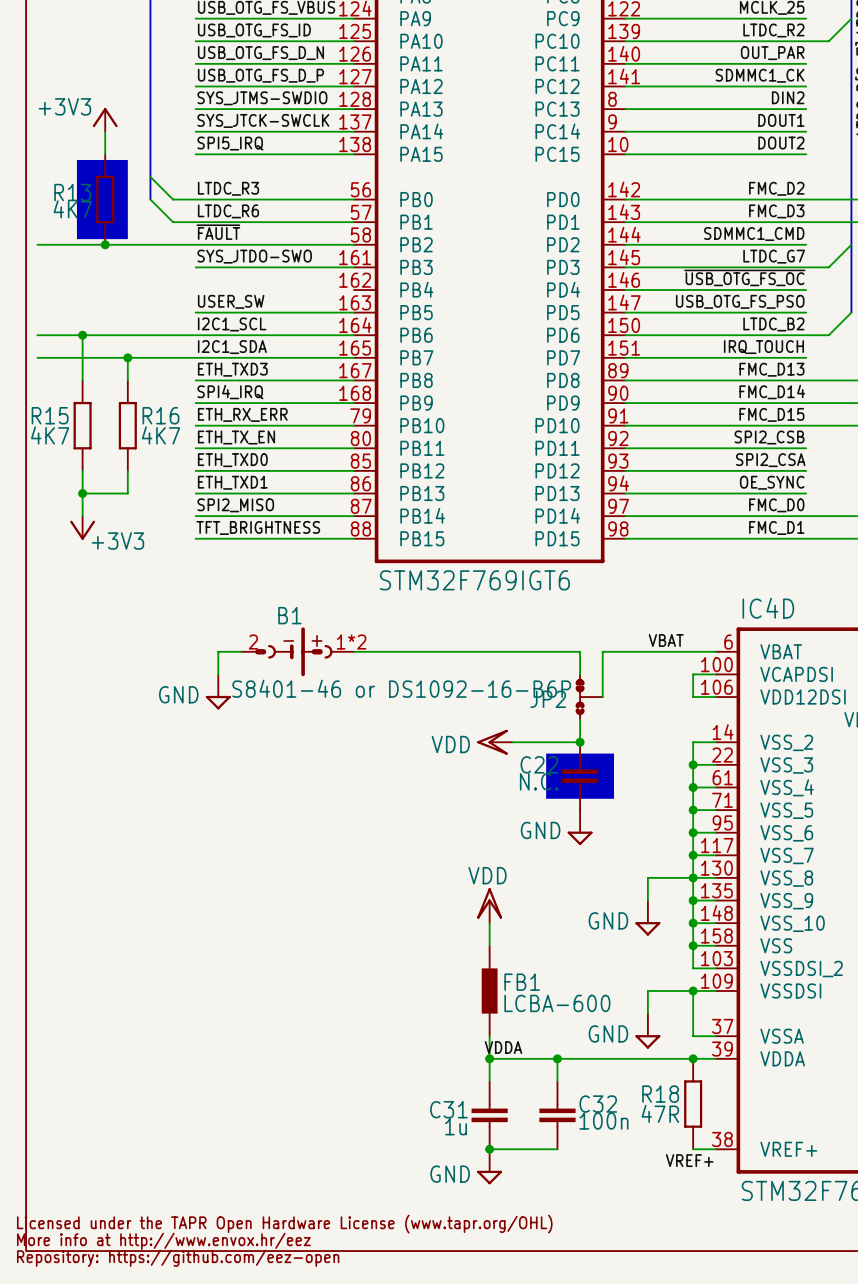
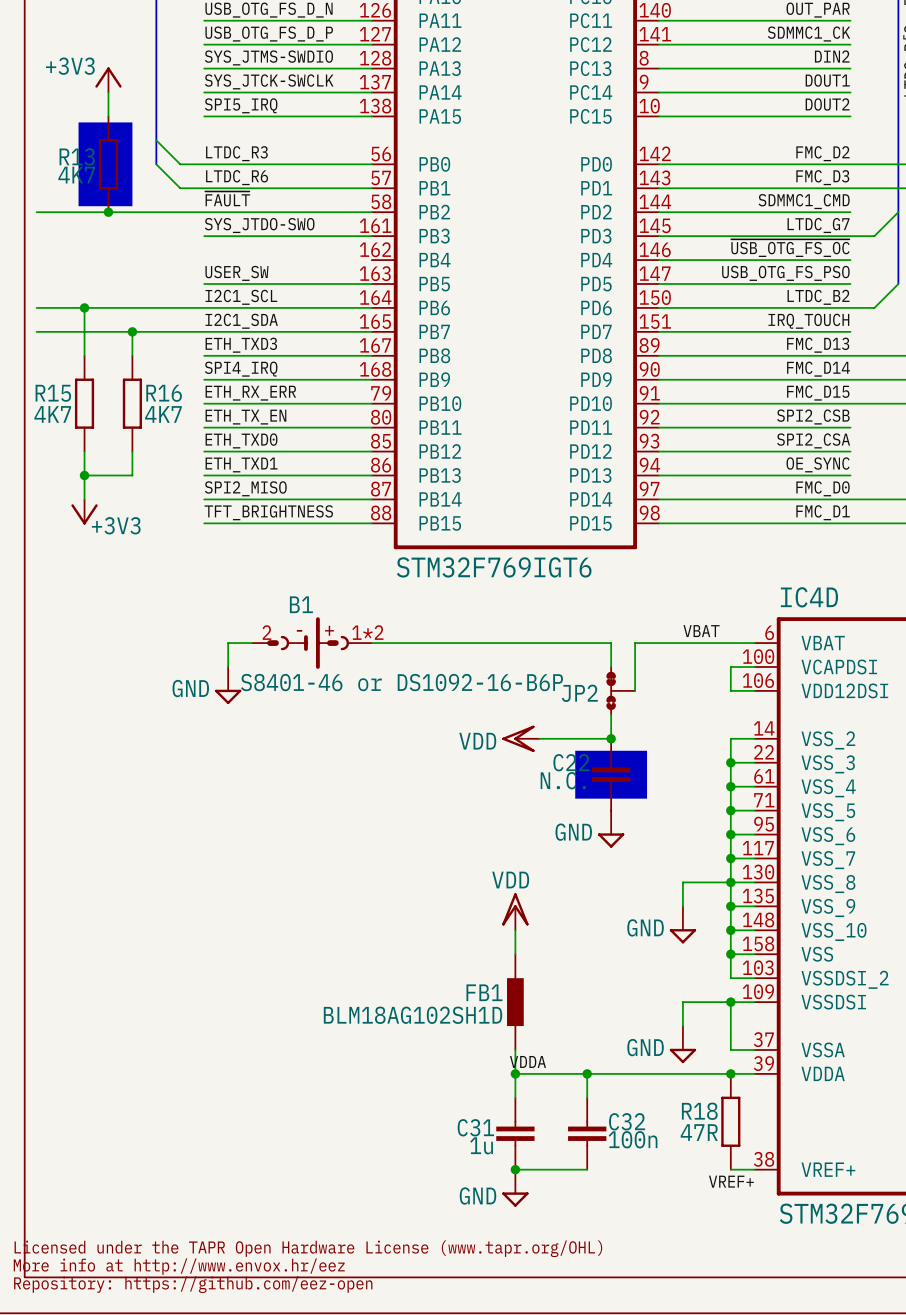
FB1 name position: FB1 (522, 982) -> FB1 (484, 992)
FB1 value: LCBA-600 (557, 1003) -> BLM18AG102SH1D (413, 1015)

